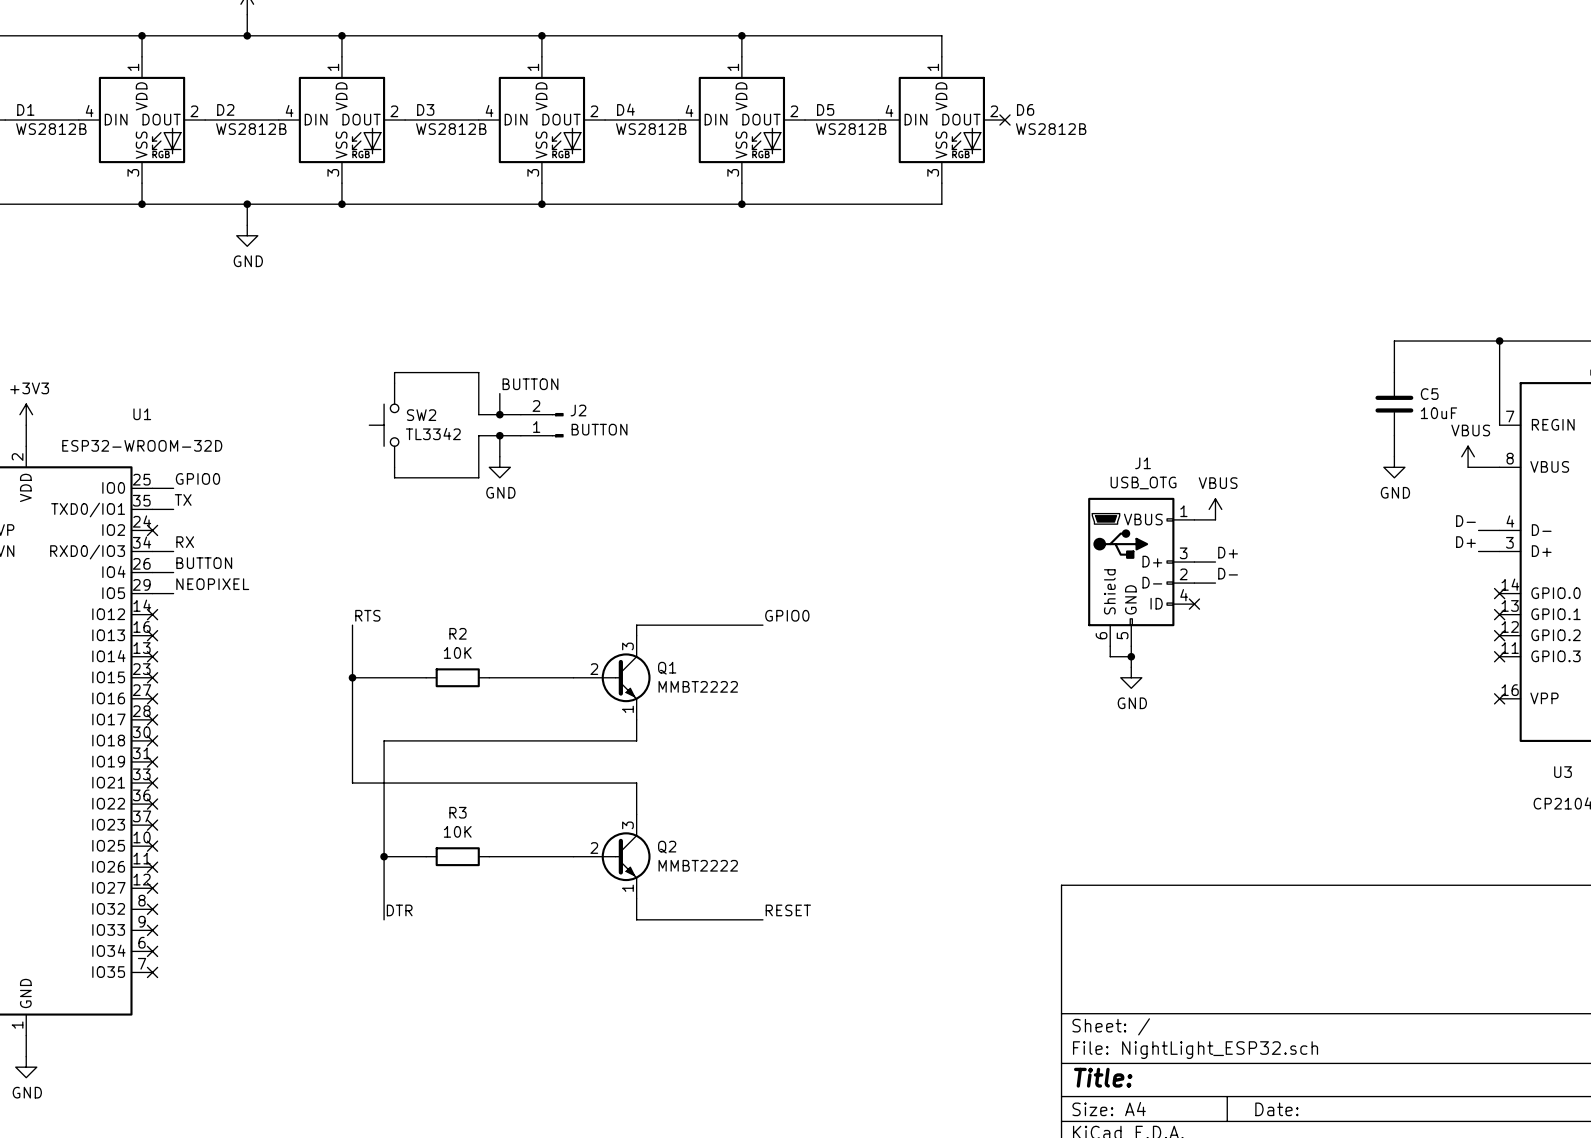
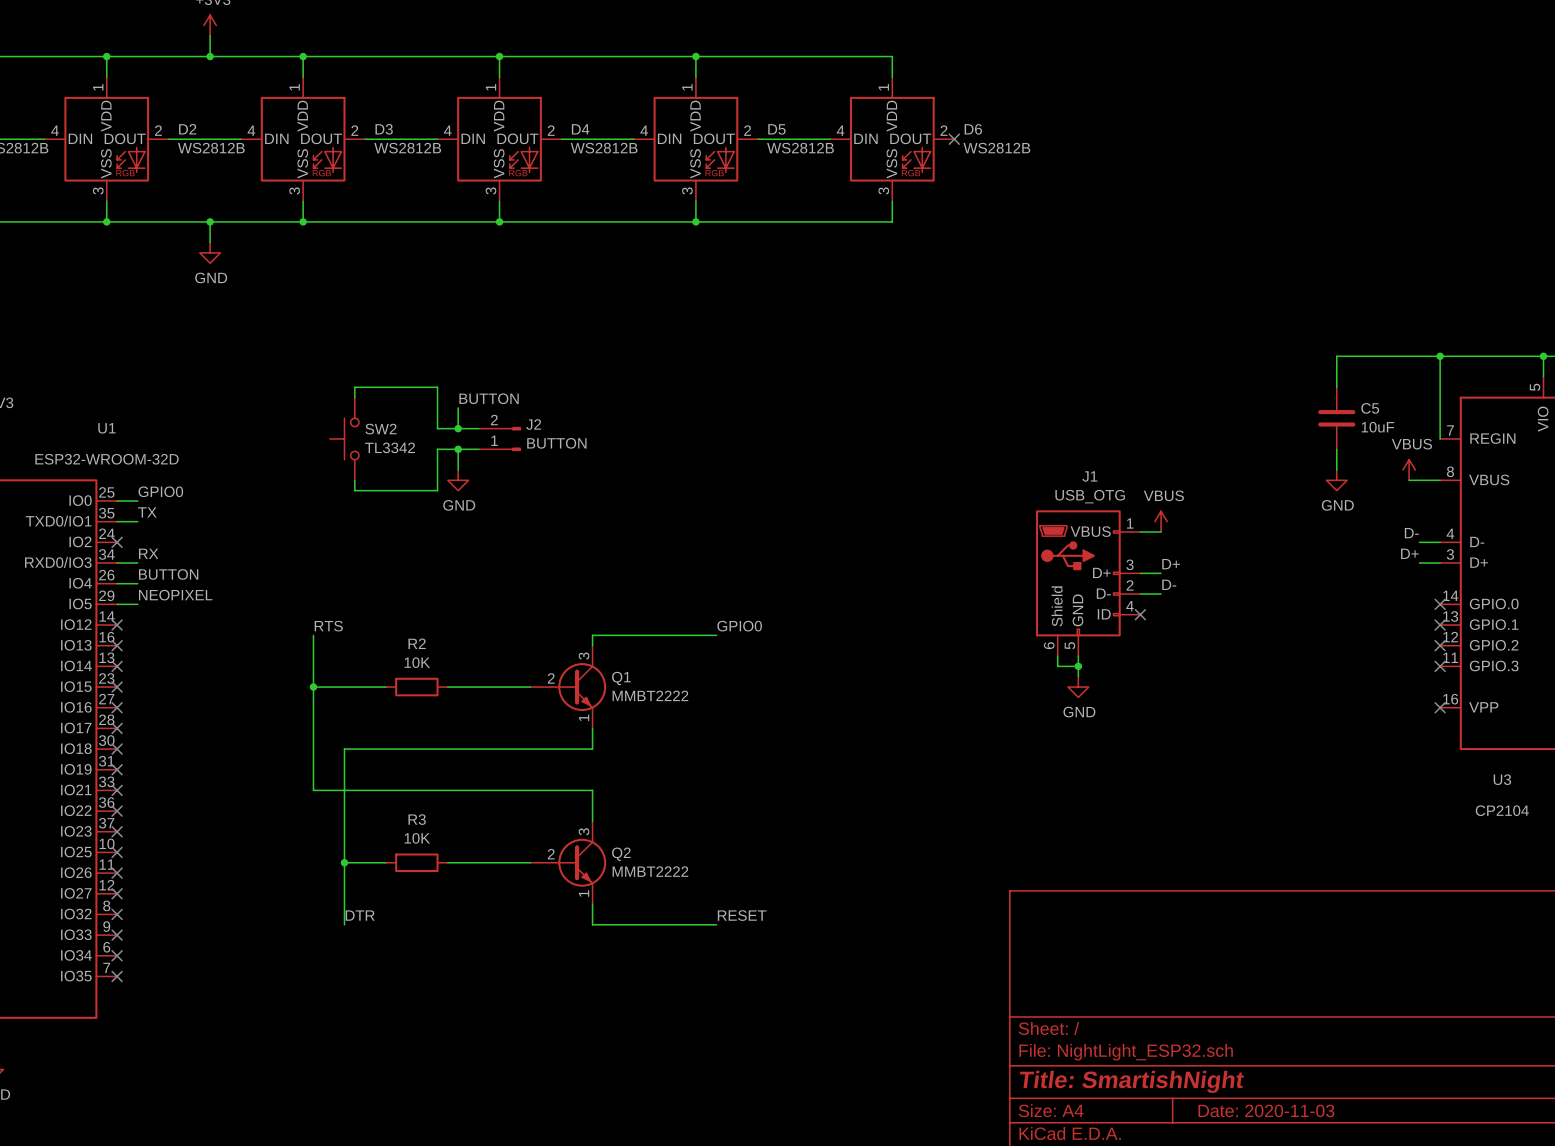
title block: Title: (1103, 1077) -> Title: SmartishNight (1131, 1081)
title block: Date: (1276, 1109) -> Date: 2020-11-03 (1266, 1110)

